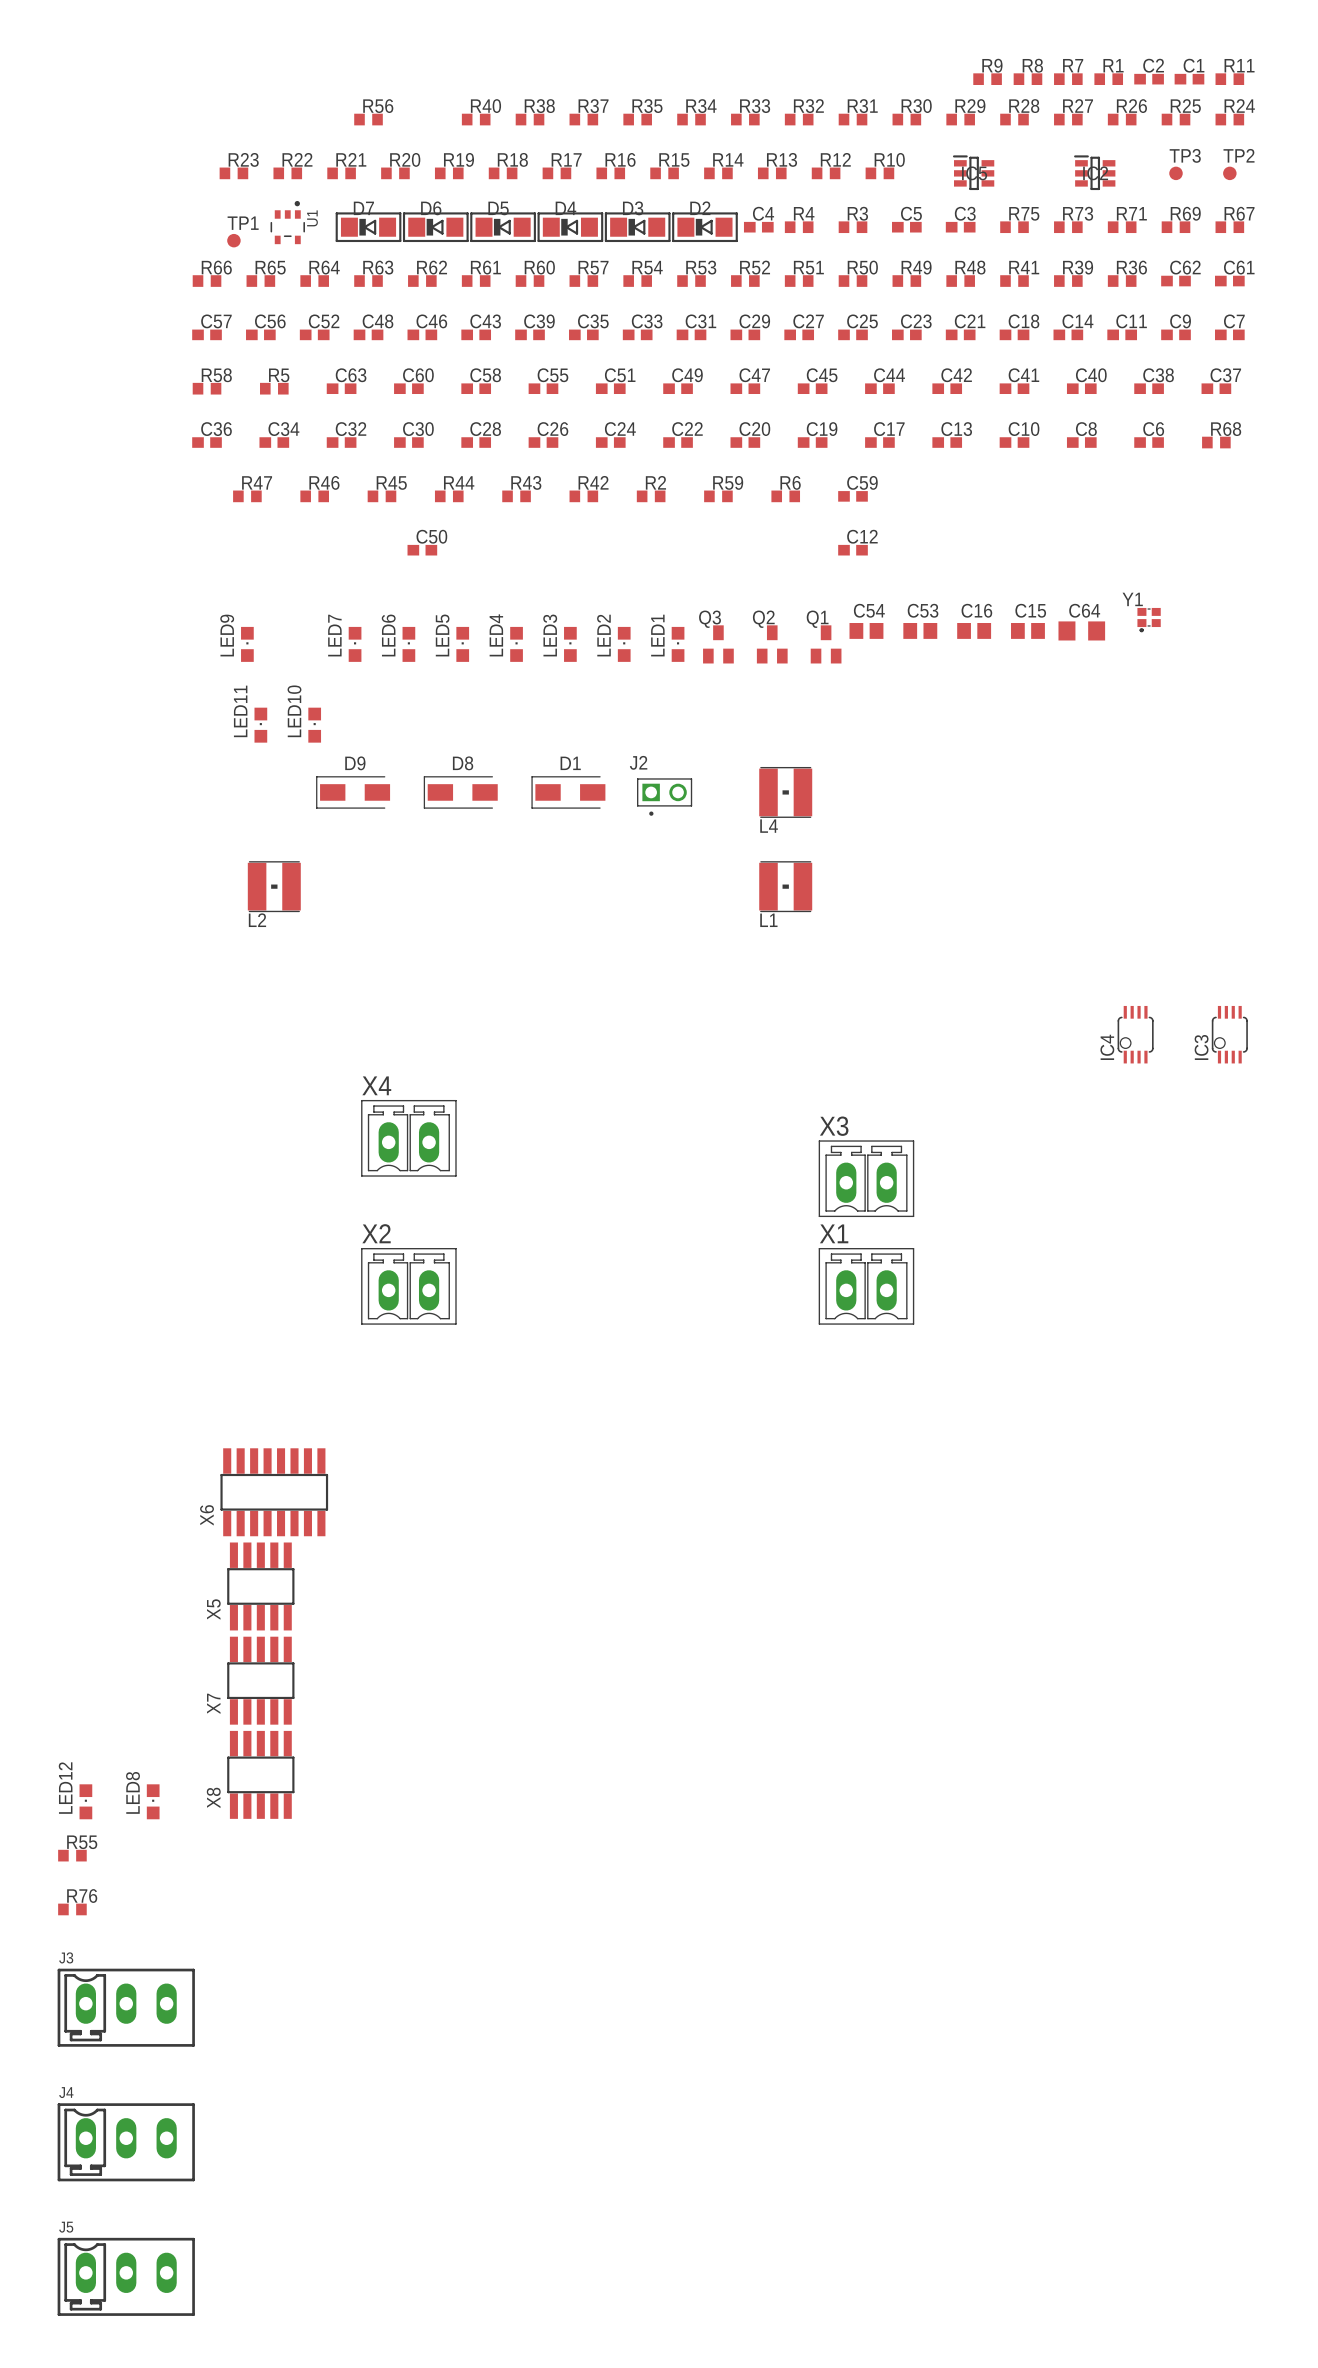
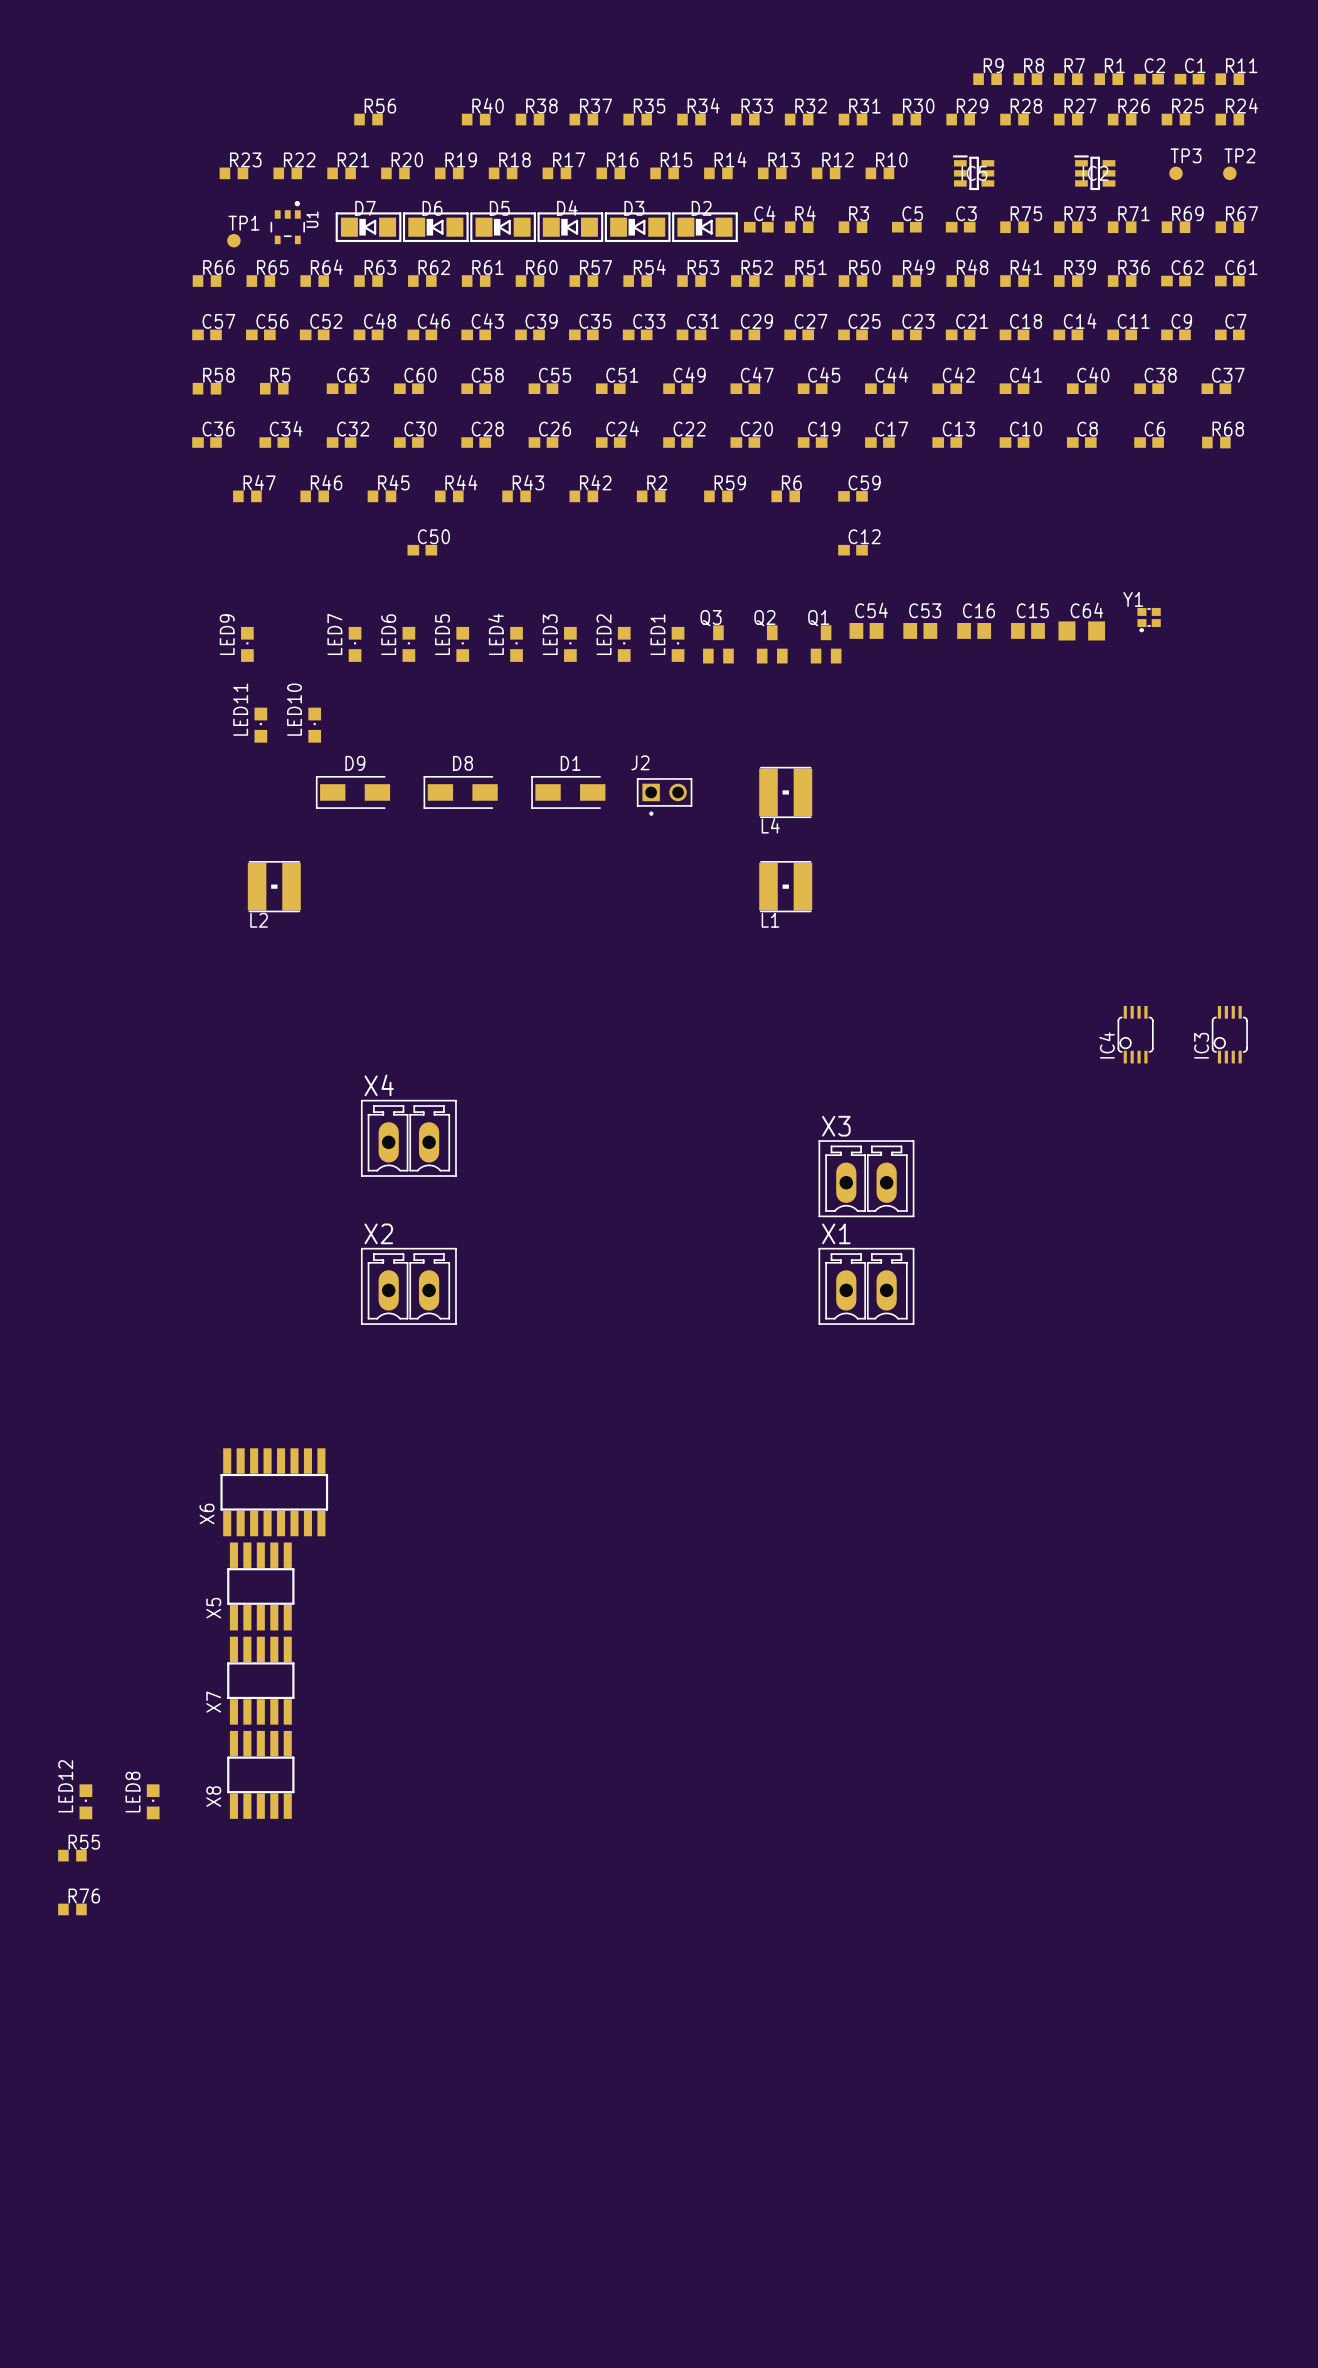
J3: (126, 2007) -> none
J4: (126, 2142) -> none
J5: (126, 2276) -> none

